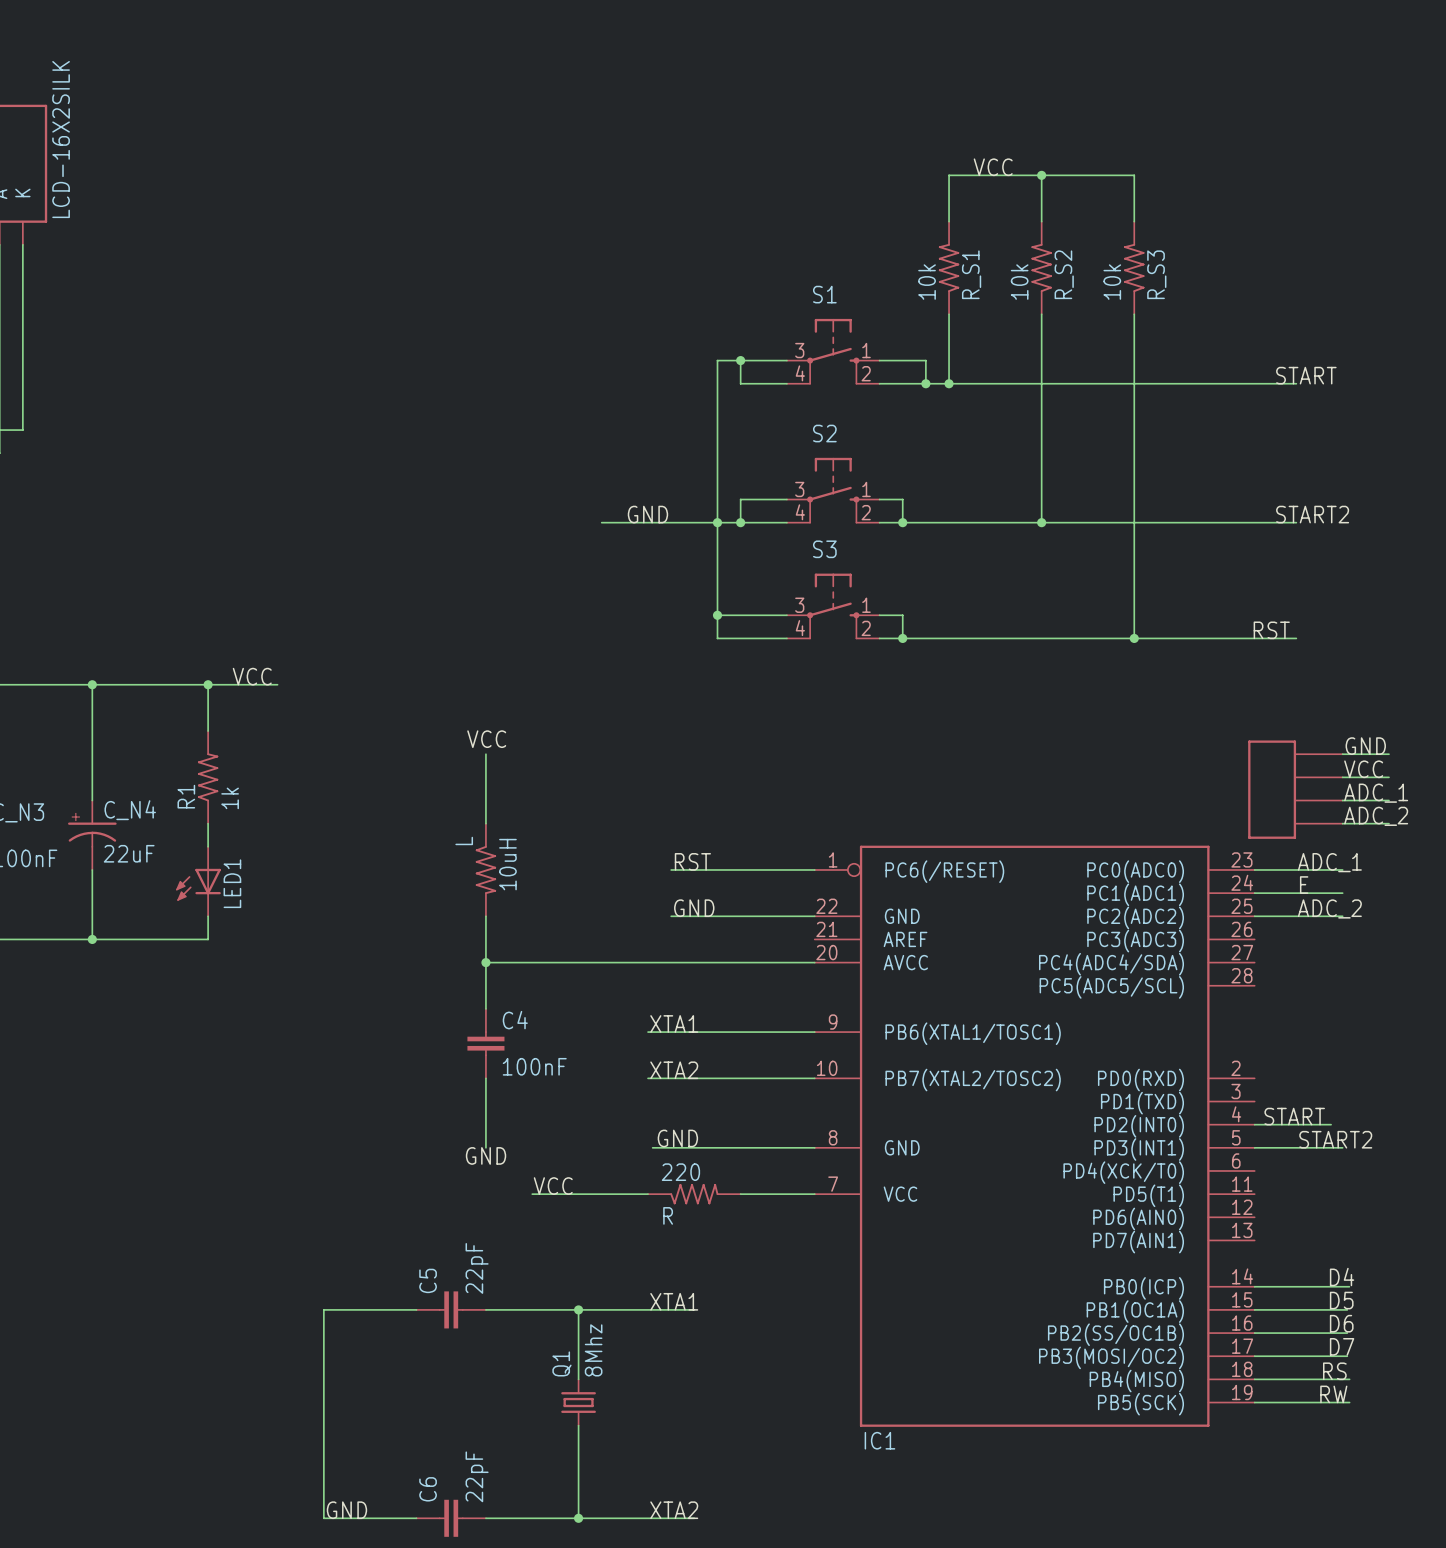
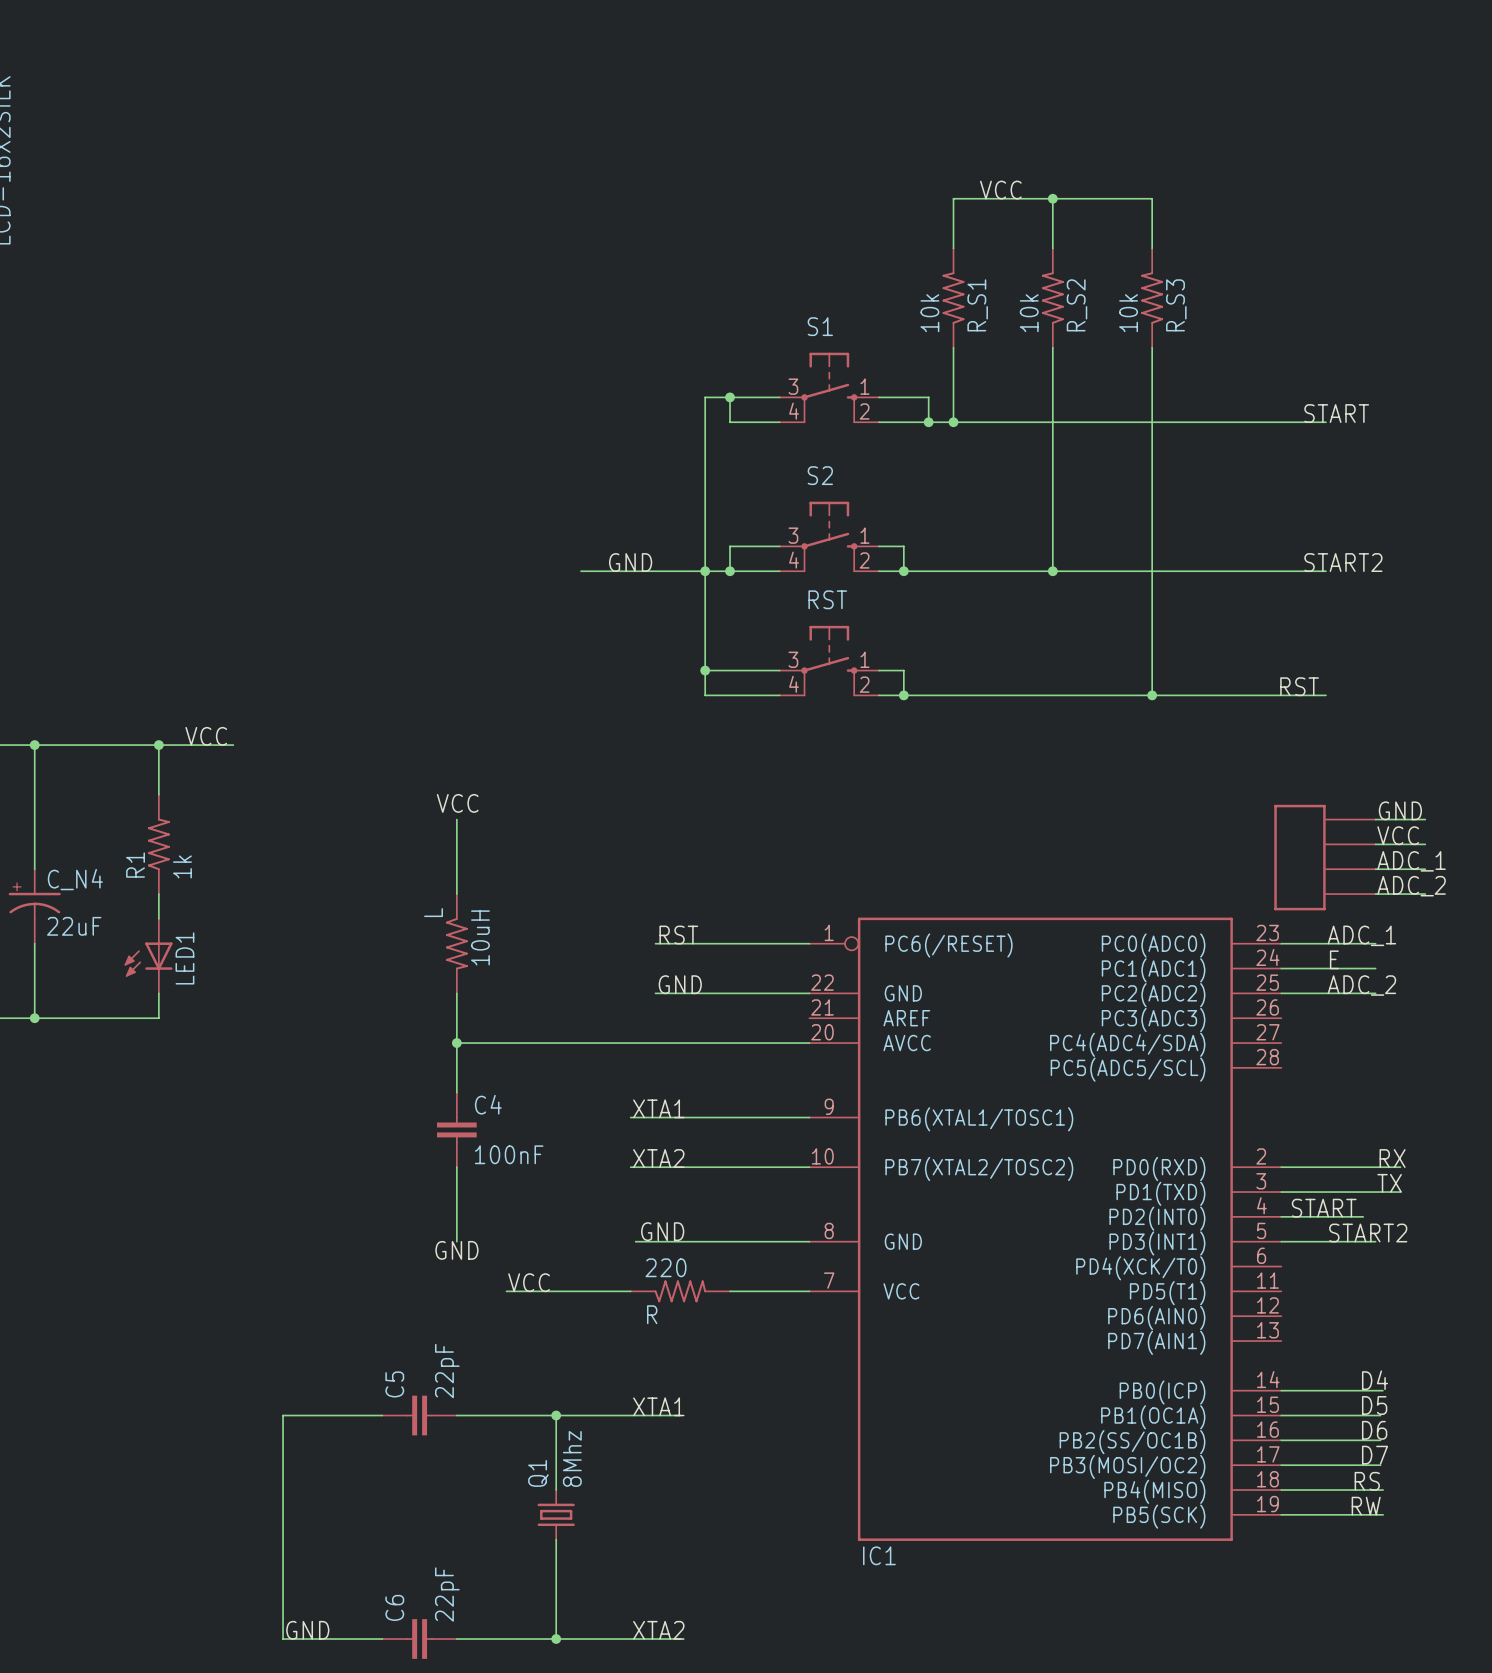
S3 name: S3 (824, 549) -> RST (827, 599)
label: none -> RX (1392, 1158)
wire: none -> (1281, 1167) (1400, 1167)
label: none -> TX (1389, 1183)
wire: none -> (1281, 1192) (1400, 1192)

